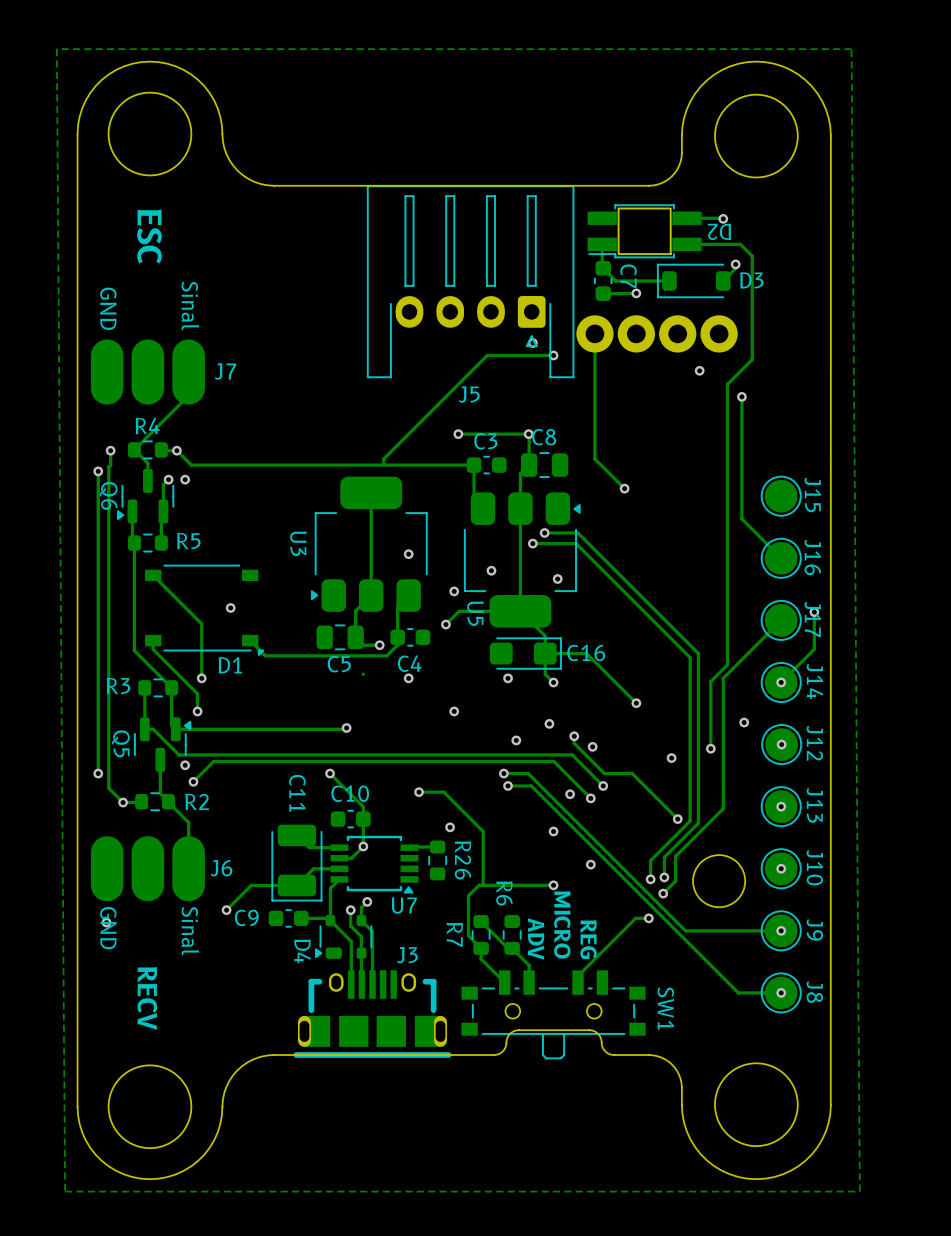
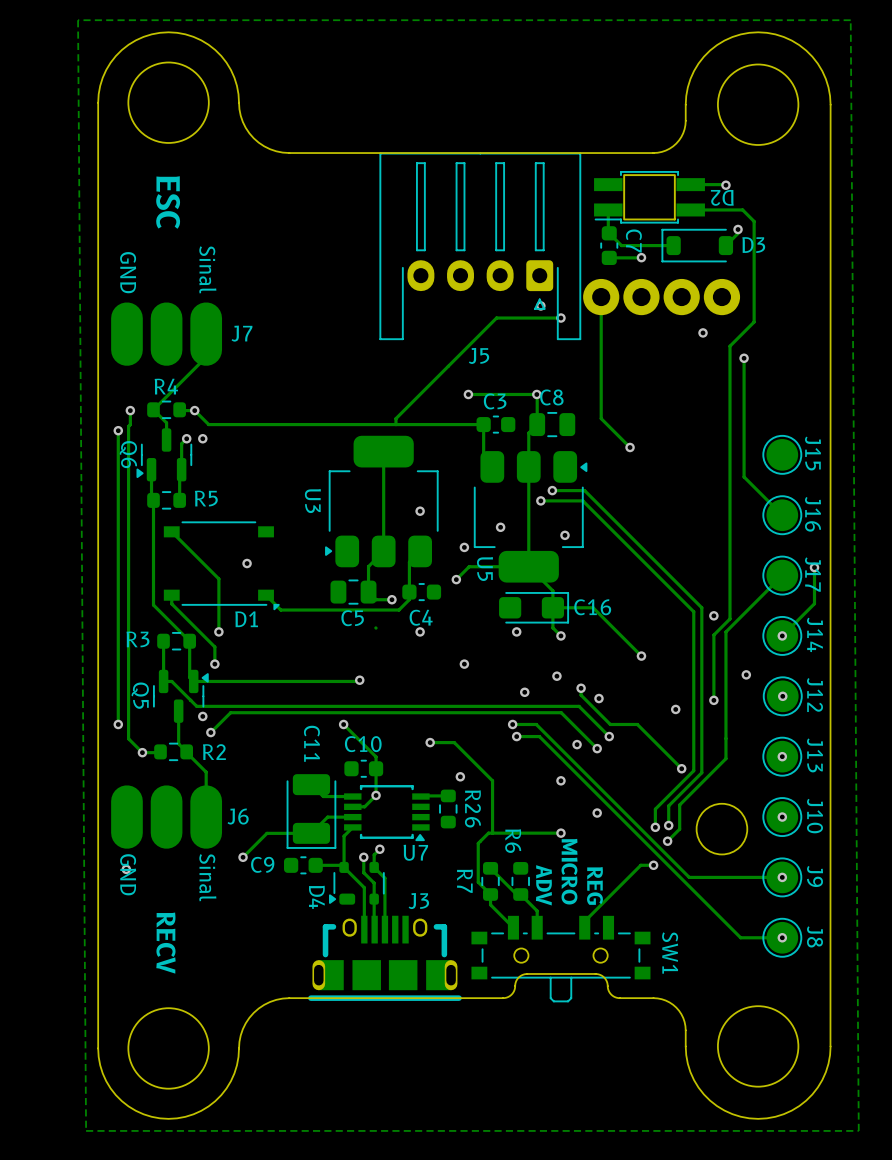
via: none -> (713, 615)

